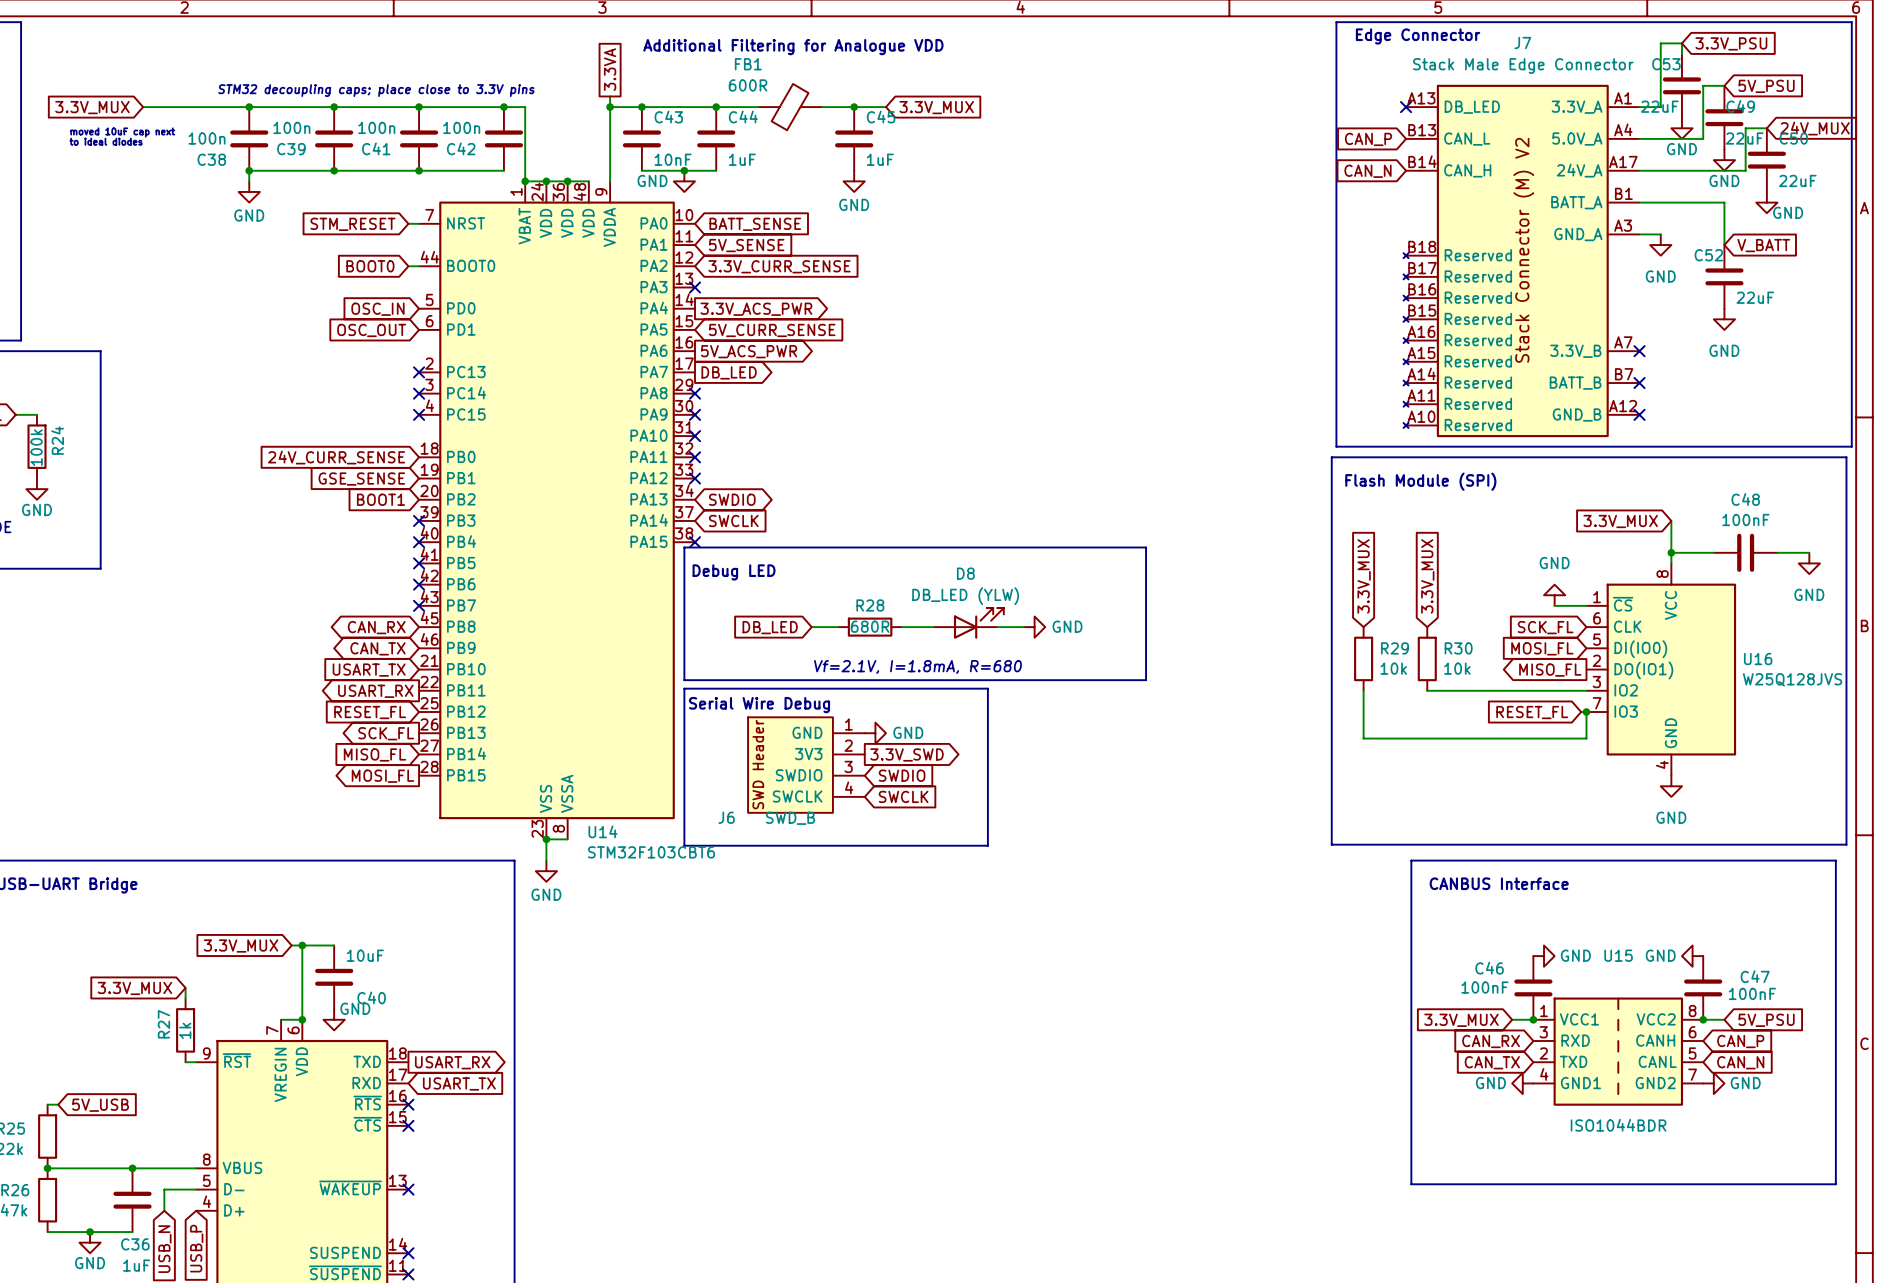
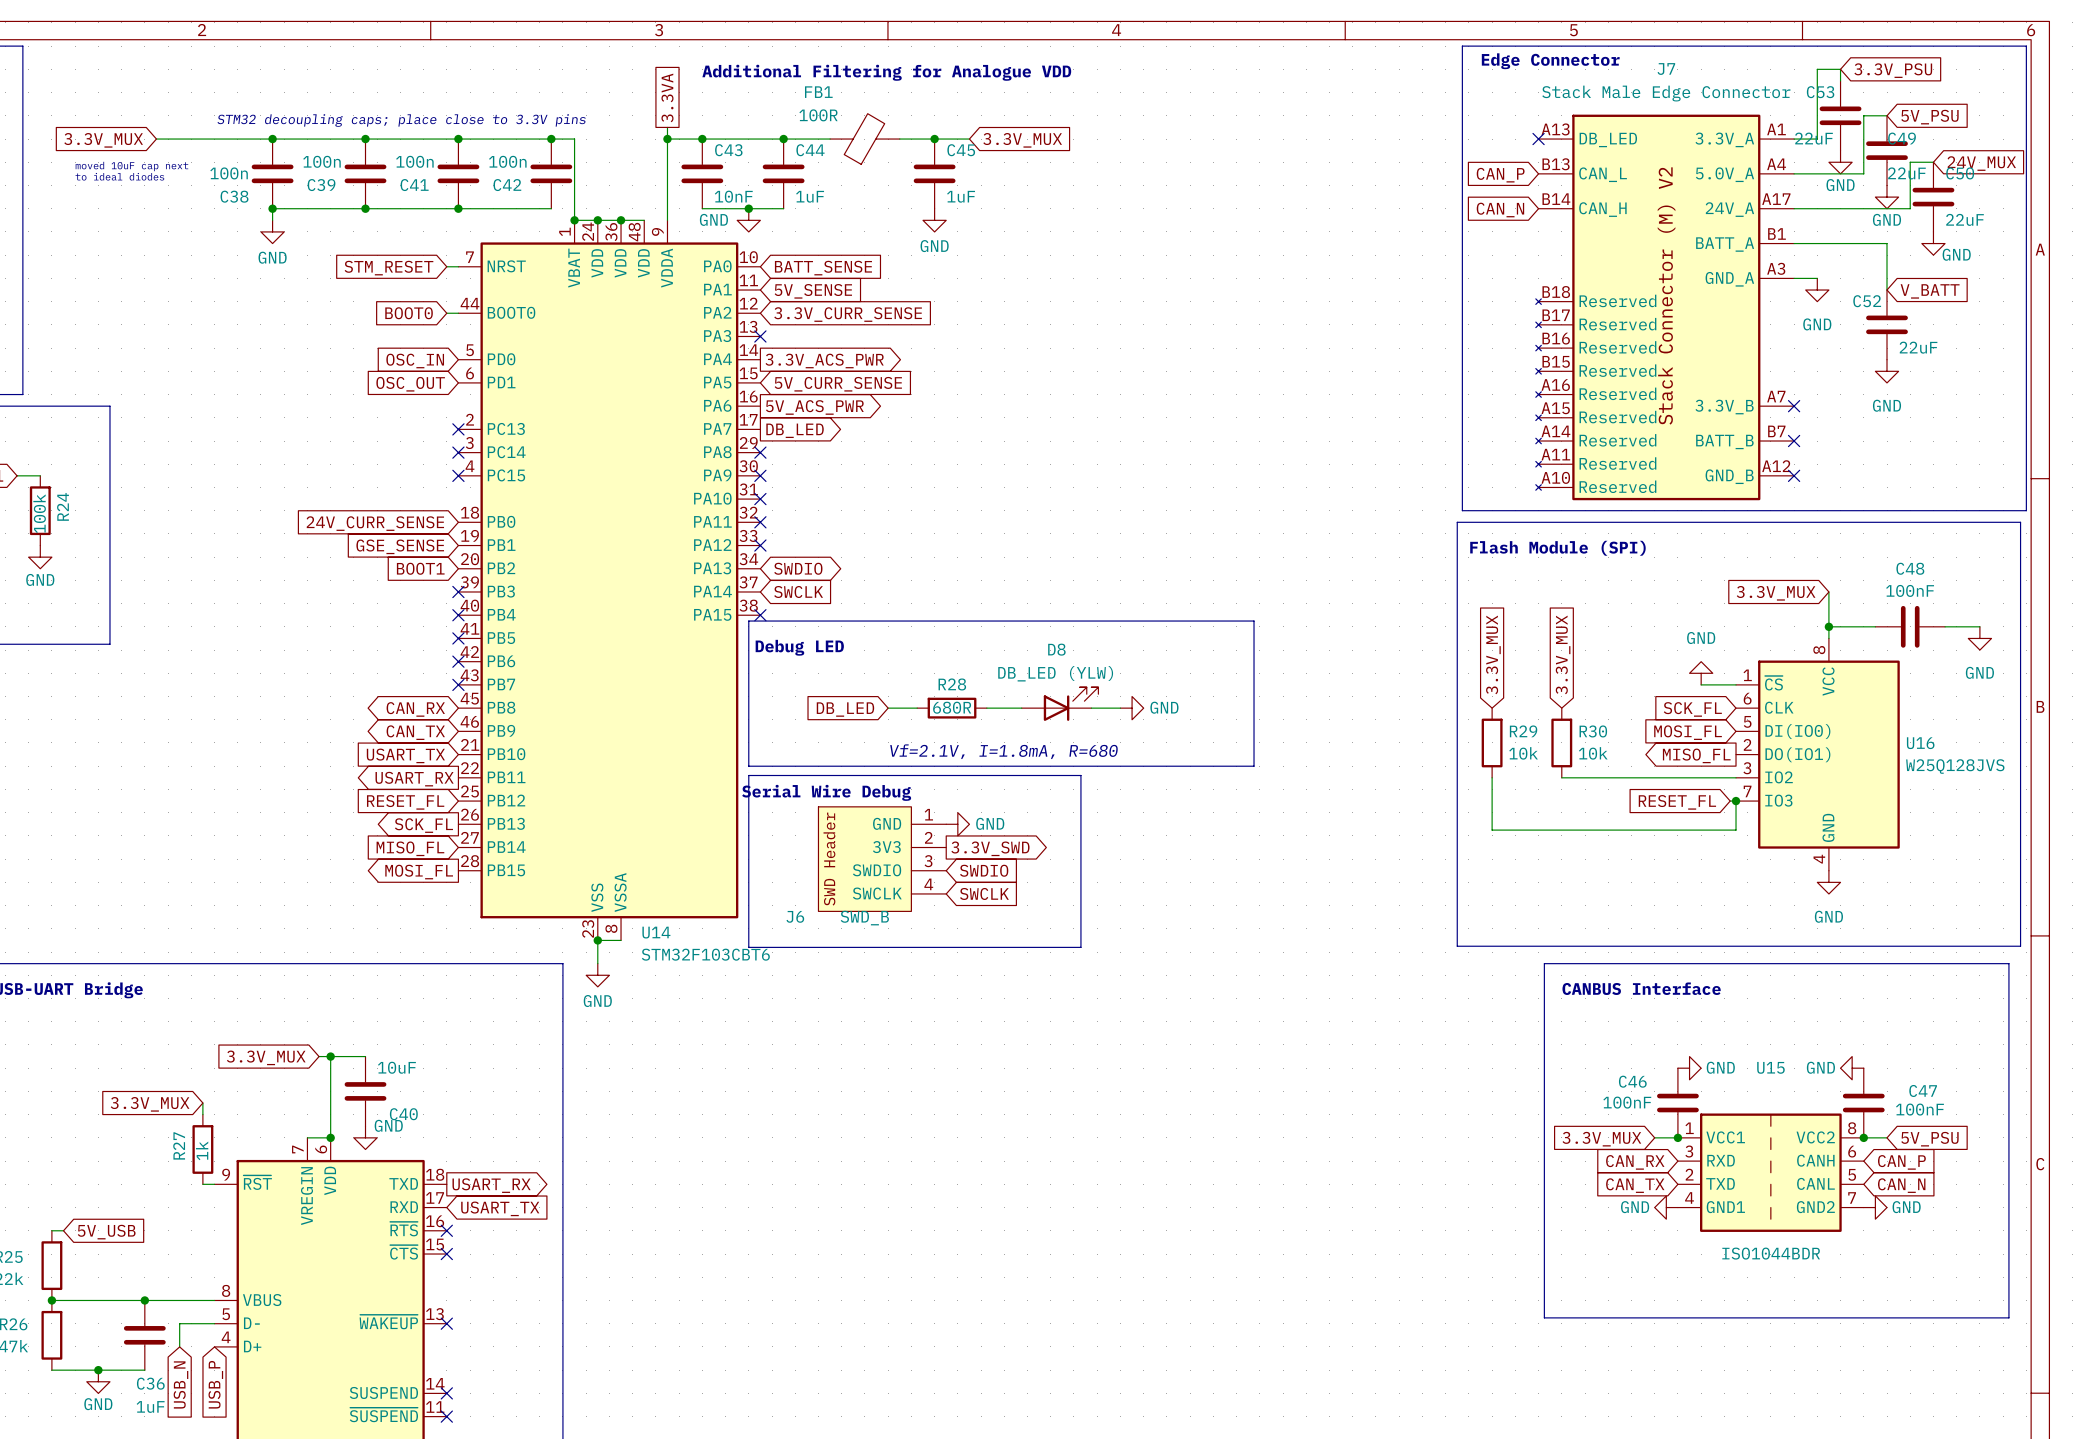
FB1 value: 600R (748, 85) -> 100R (818, 115)

